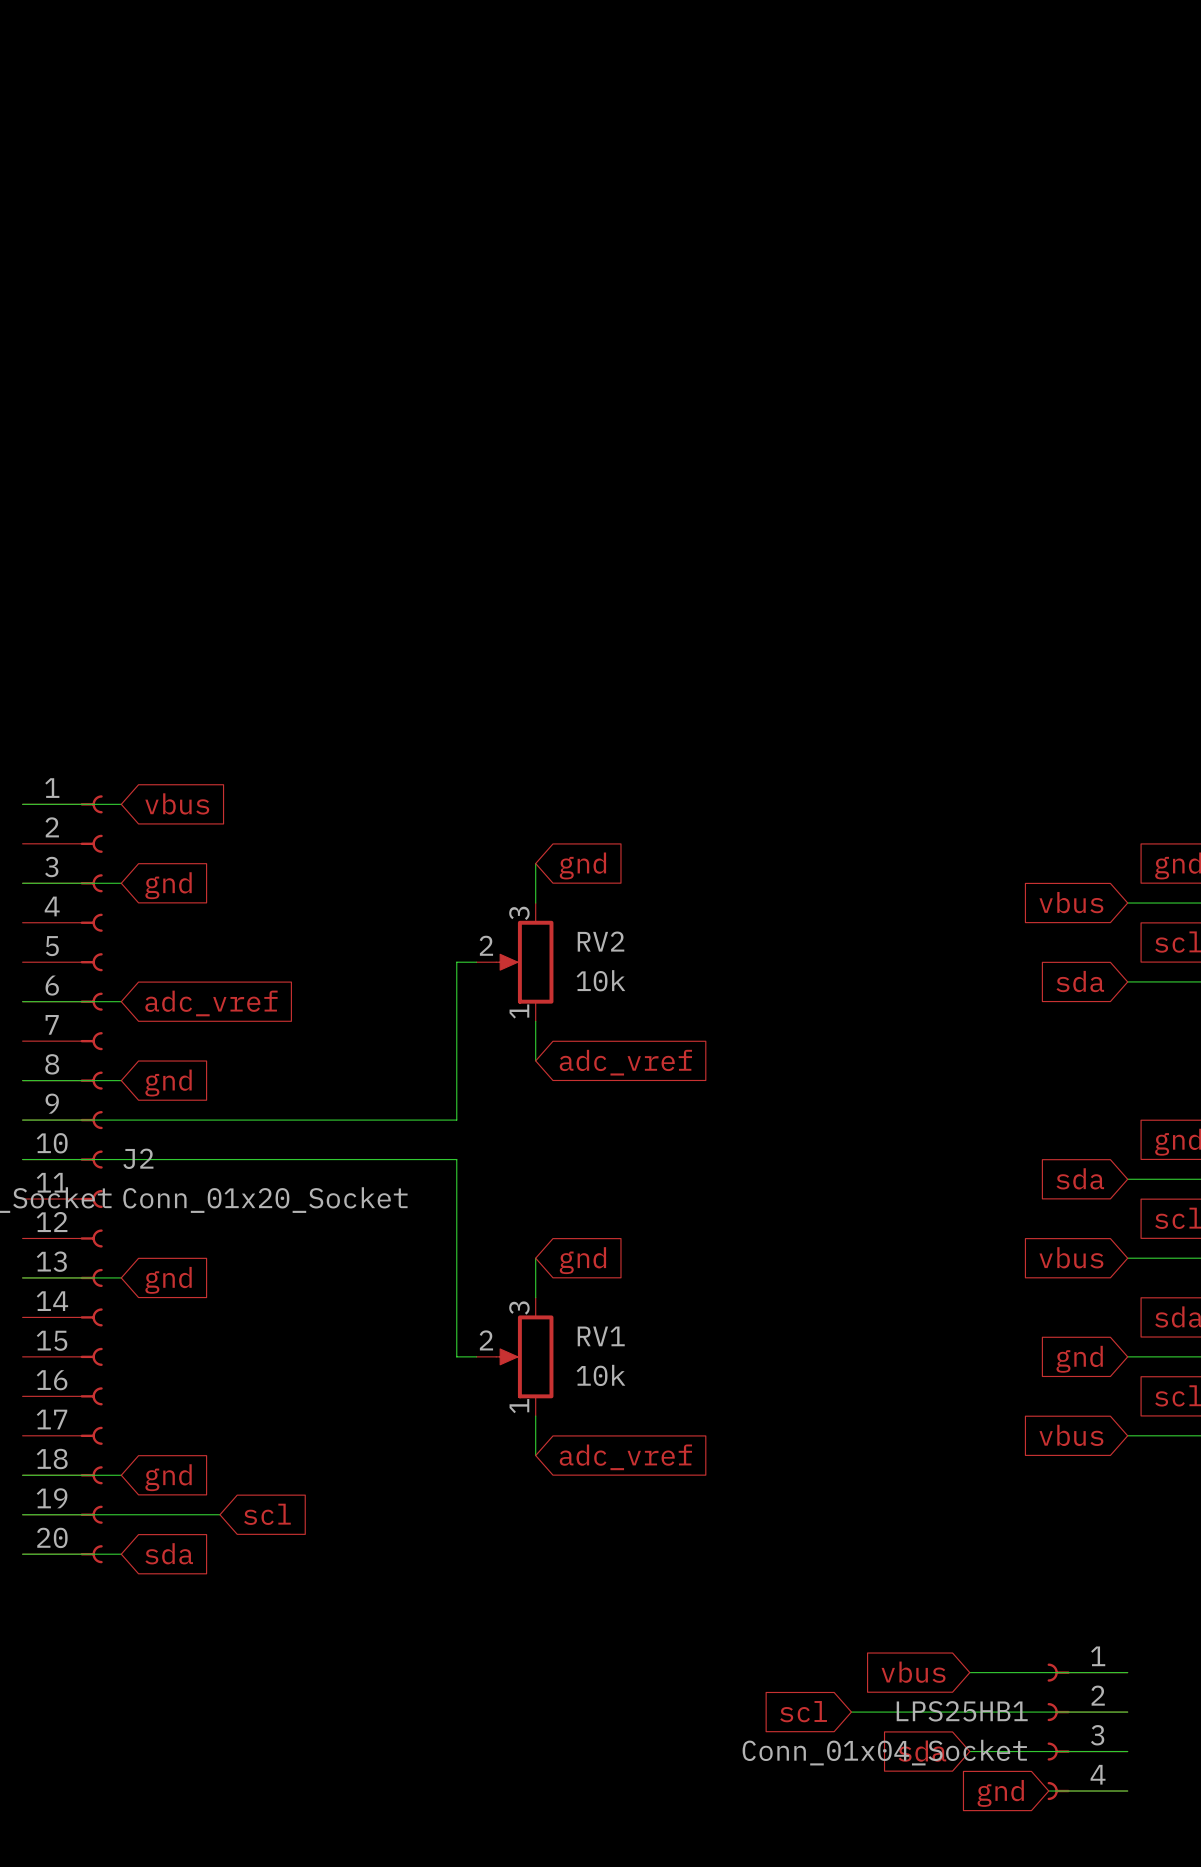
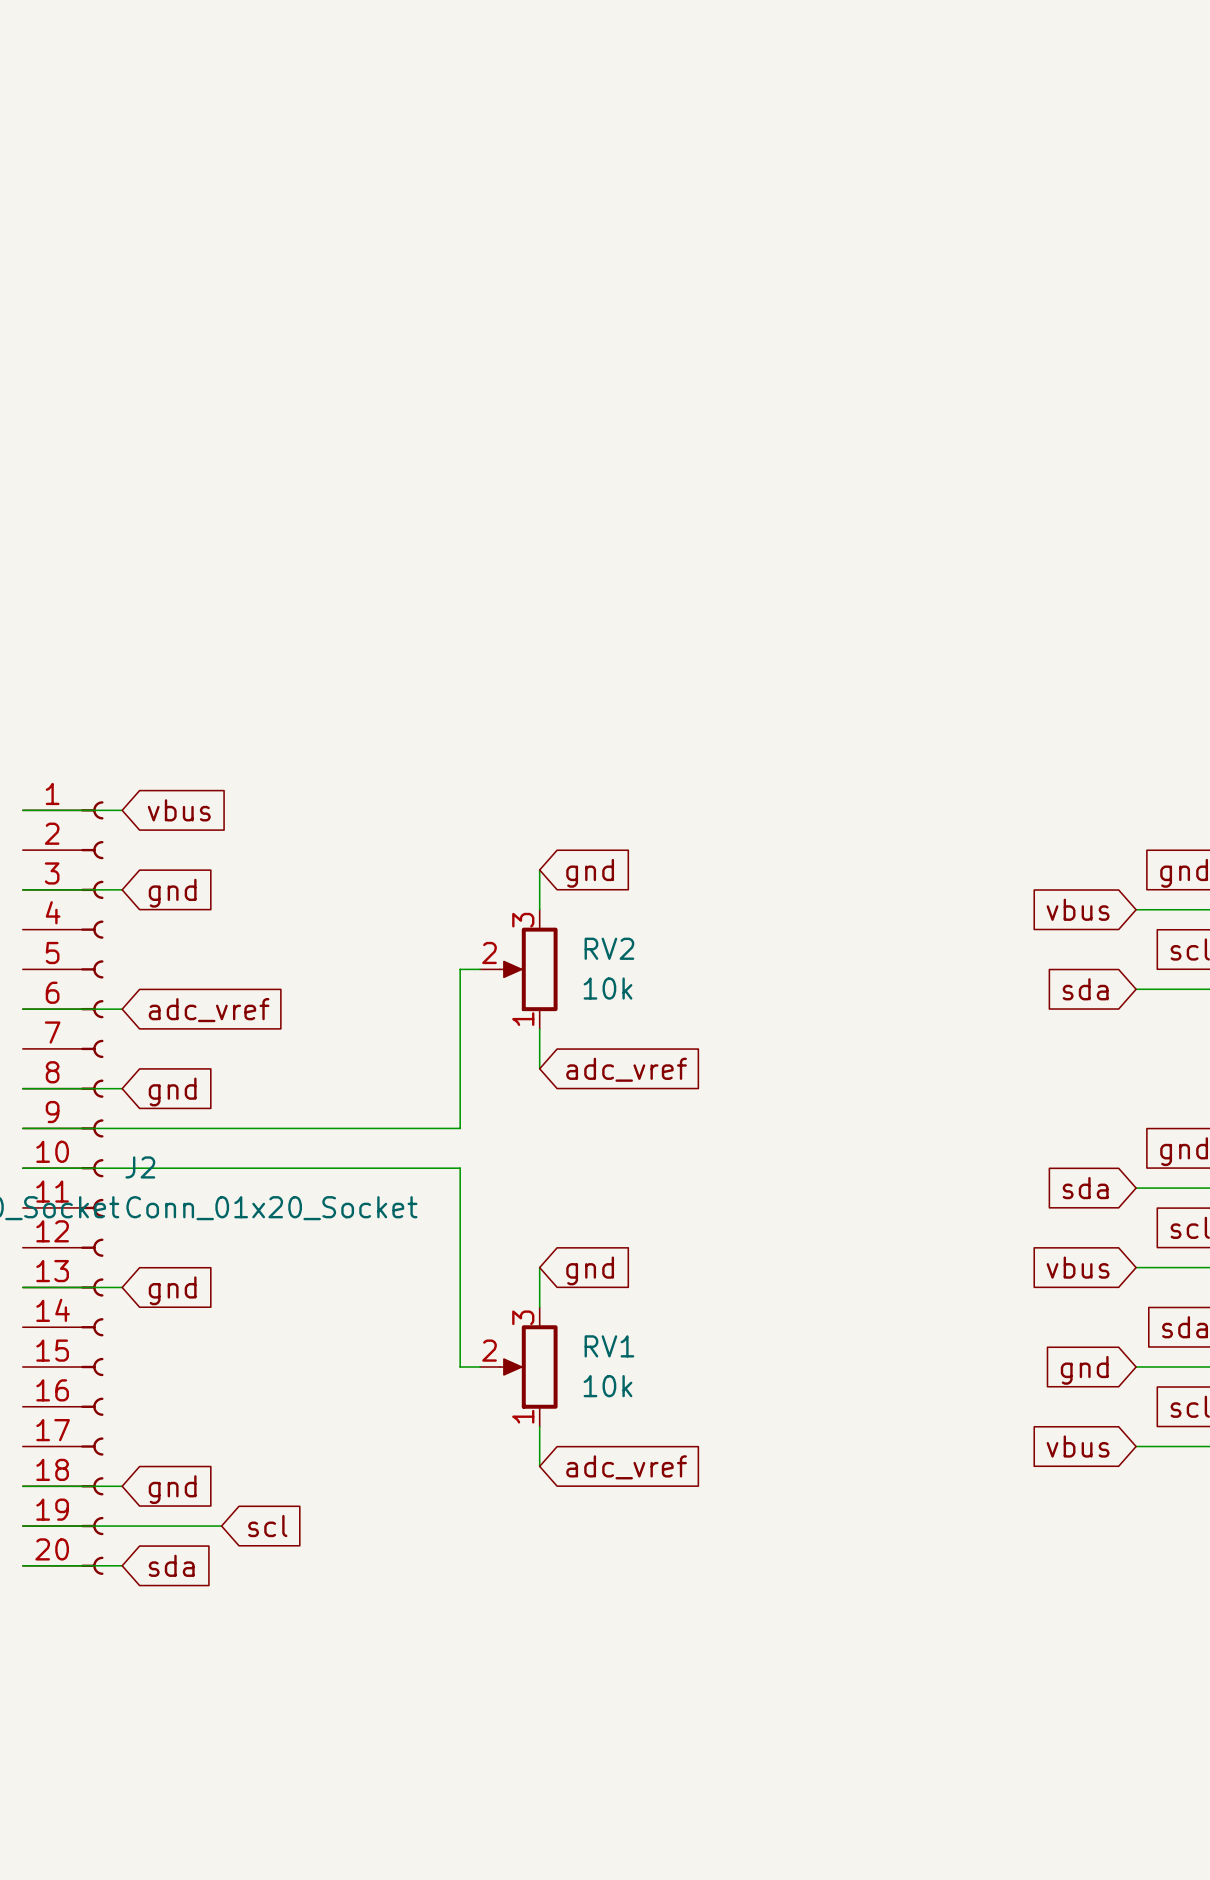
global label: vbus (913, 1672) -> none
wire: (969, 1672) (1127, 1672) -> none
global label: scl (803, 1711) -> none
wire: (851, 1712) (1127, 1712) -> none
LPS25HB1: Conn_01x04_Socket (1087, 1731) -> none
global label: sda (922, 1751) -> none
wire: (969, 1751) (1127, 1751) -> none
wire: (1048, 1791) (1127, 1791) -> none
global label: gnd (1000, 1793) -> none

